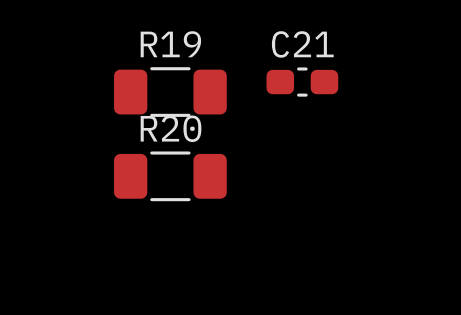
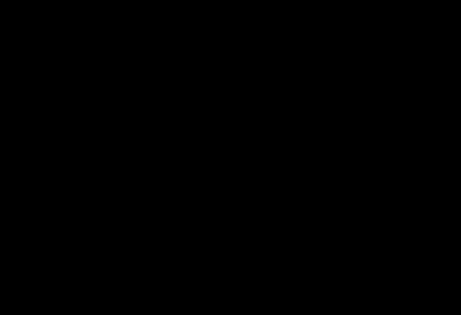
C21: (302, 82) -> none
R19: (170, 92) -> none
R20: (170, 176) -> none

